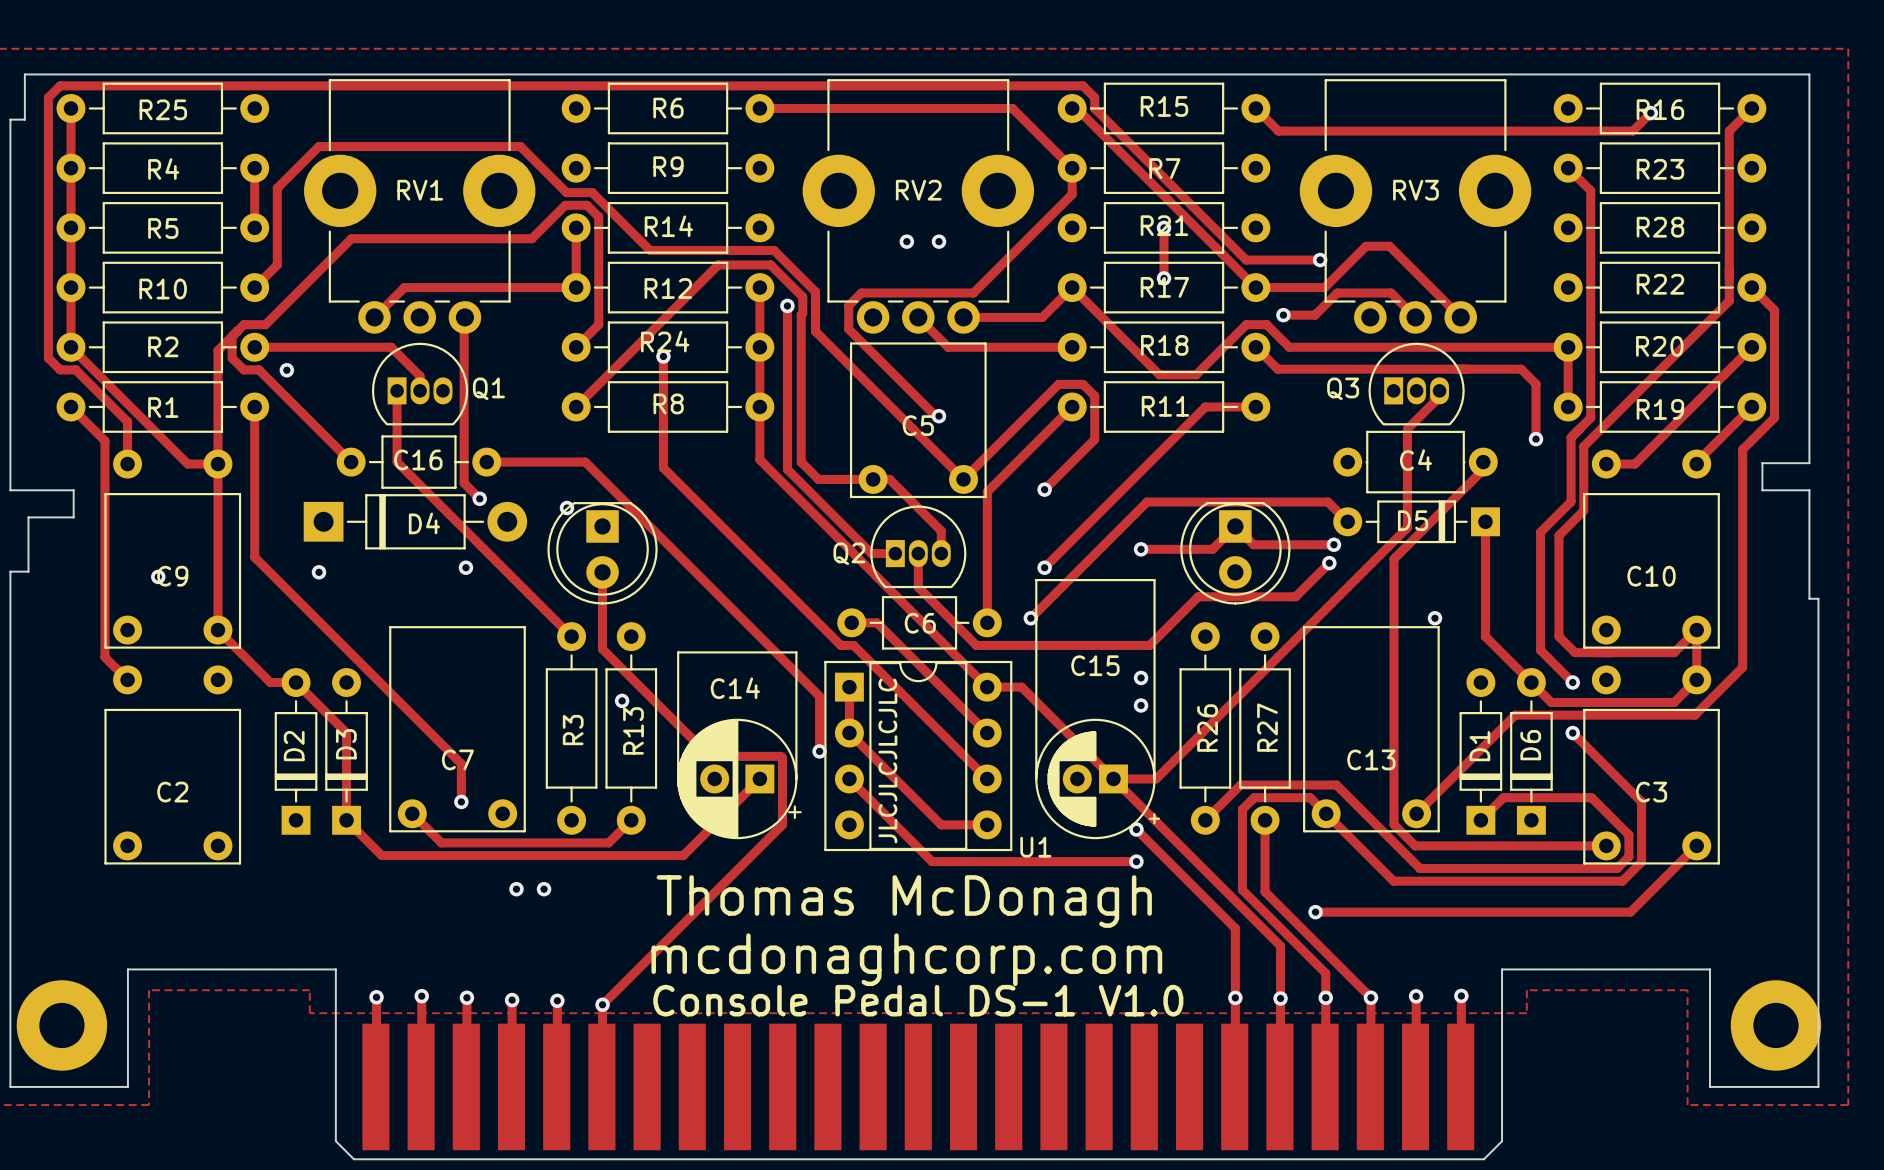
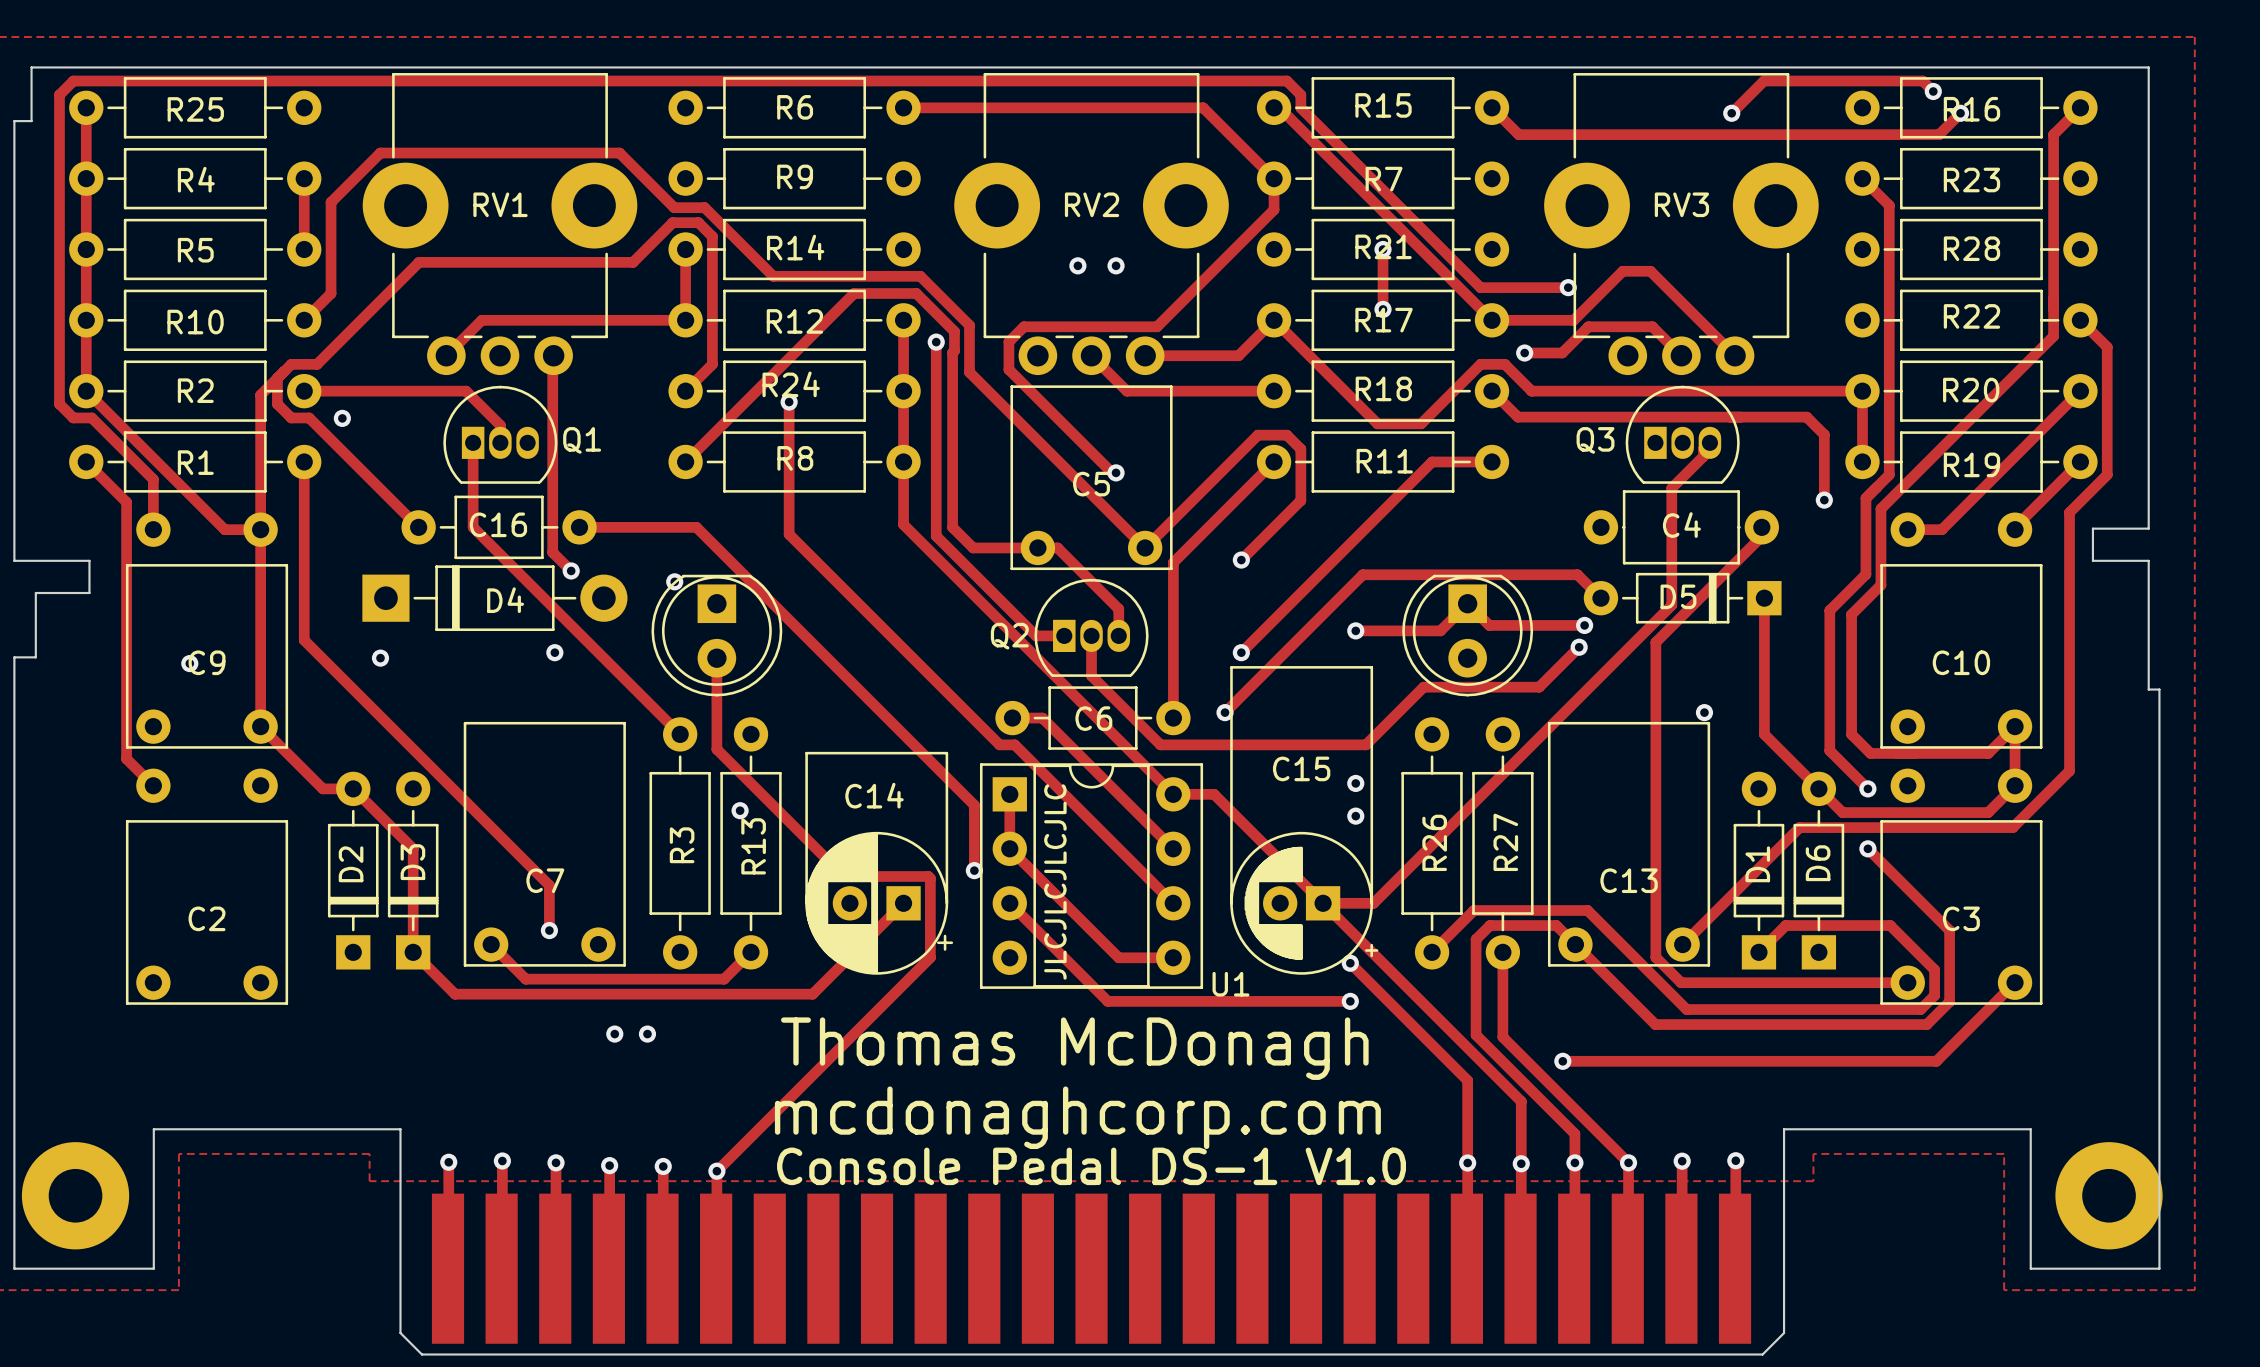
track: none -> (1933, 91) (1922, 81) (1763, 81) (1731, 113)
via: none -> (1933, 91)
via: none -> (1731, 113)

